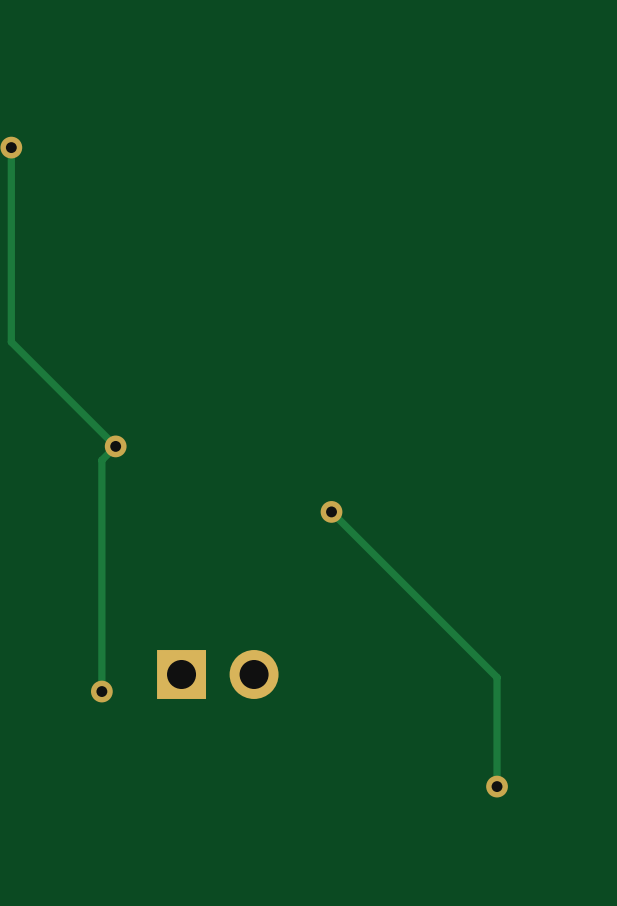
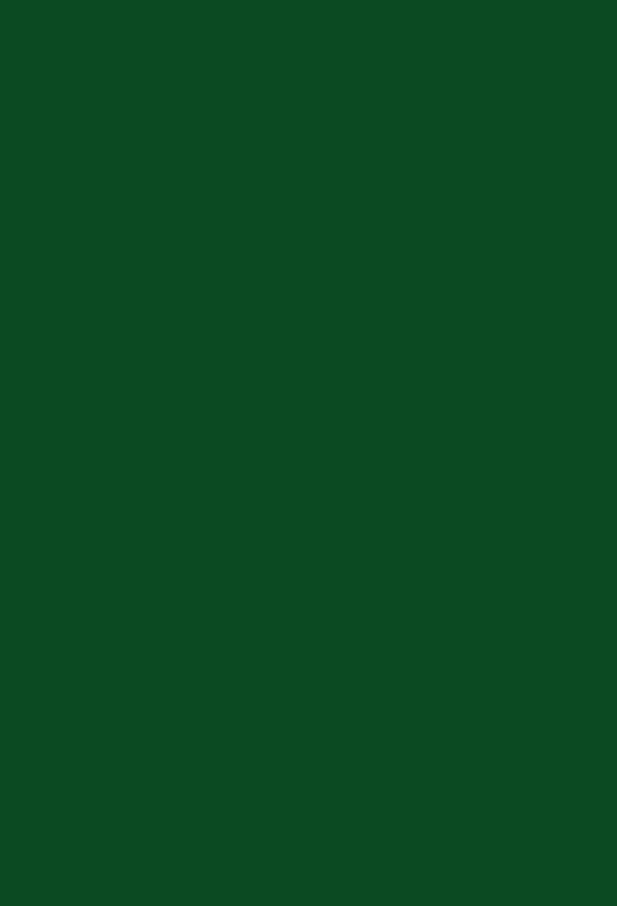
track: (11, 147) (11, 342) (115, 446) (101, 460) (101, 691) -> none
via: (11, 147) -> none
via: (115, 446) -> none
track: (331, 511) (497, 677) (497, 786) -> none
via: (331, 511) -> none
part: (217, 674) -> none
via: (101, 691) -> none
via: (497, 786) -> none

